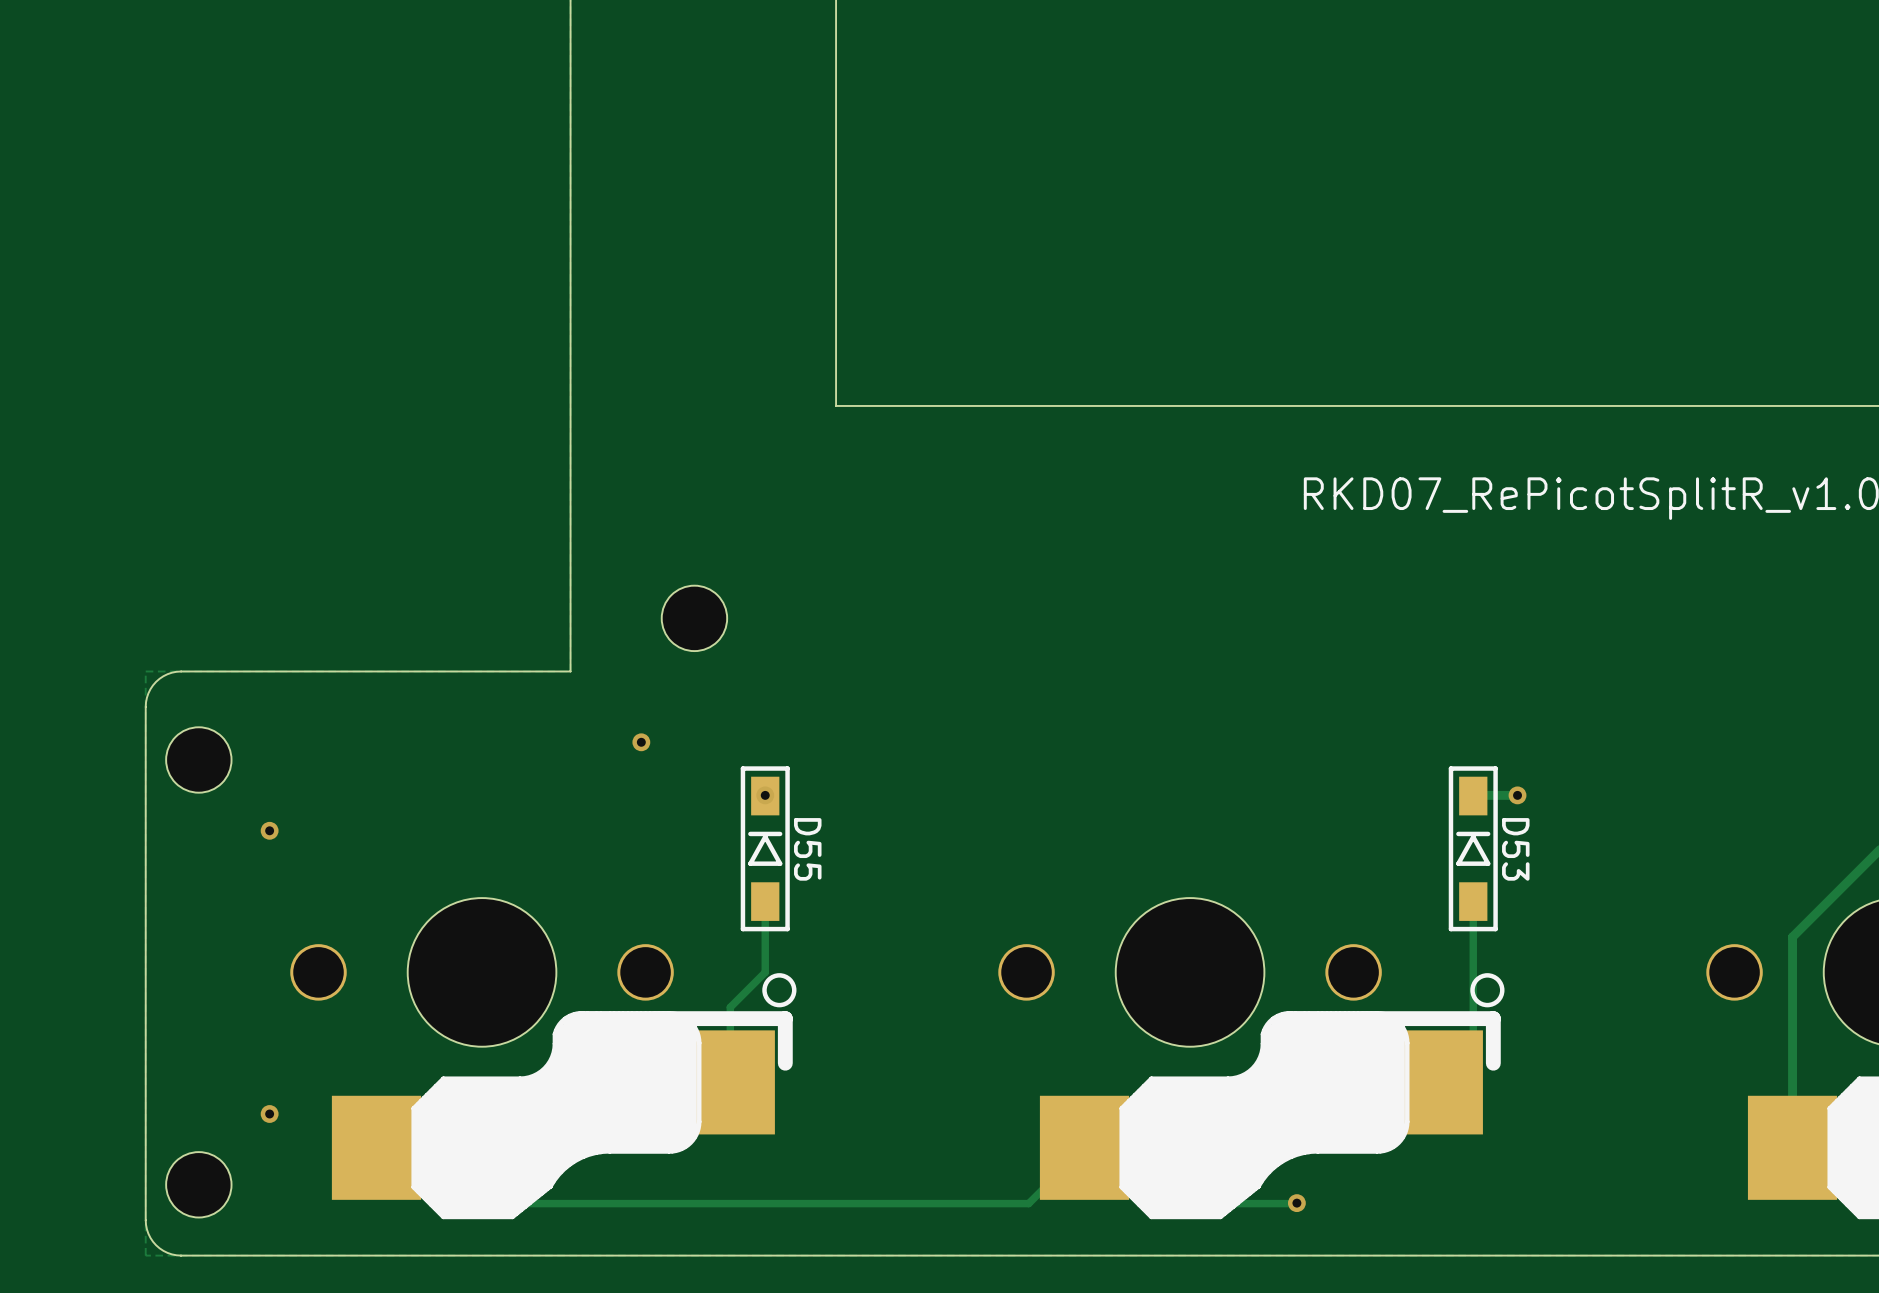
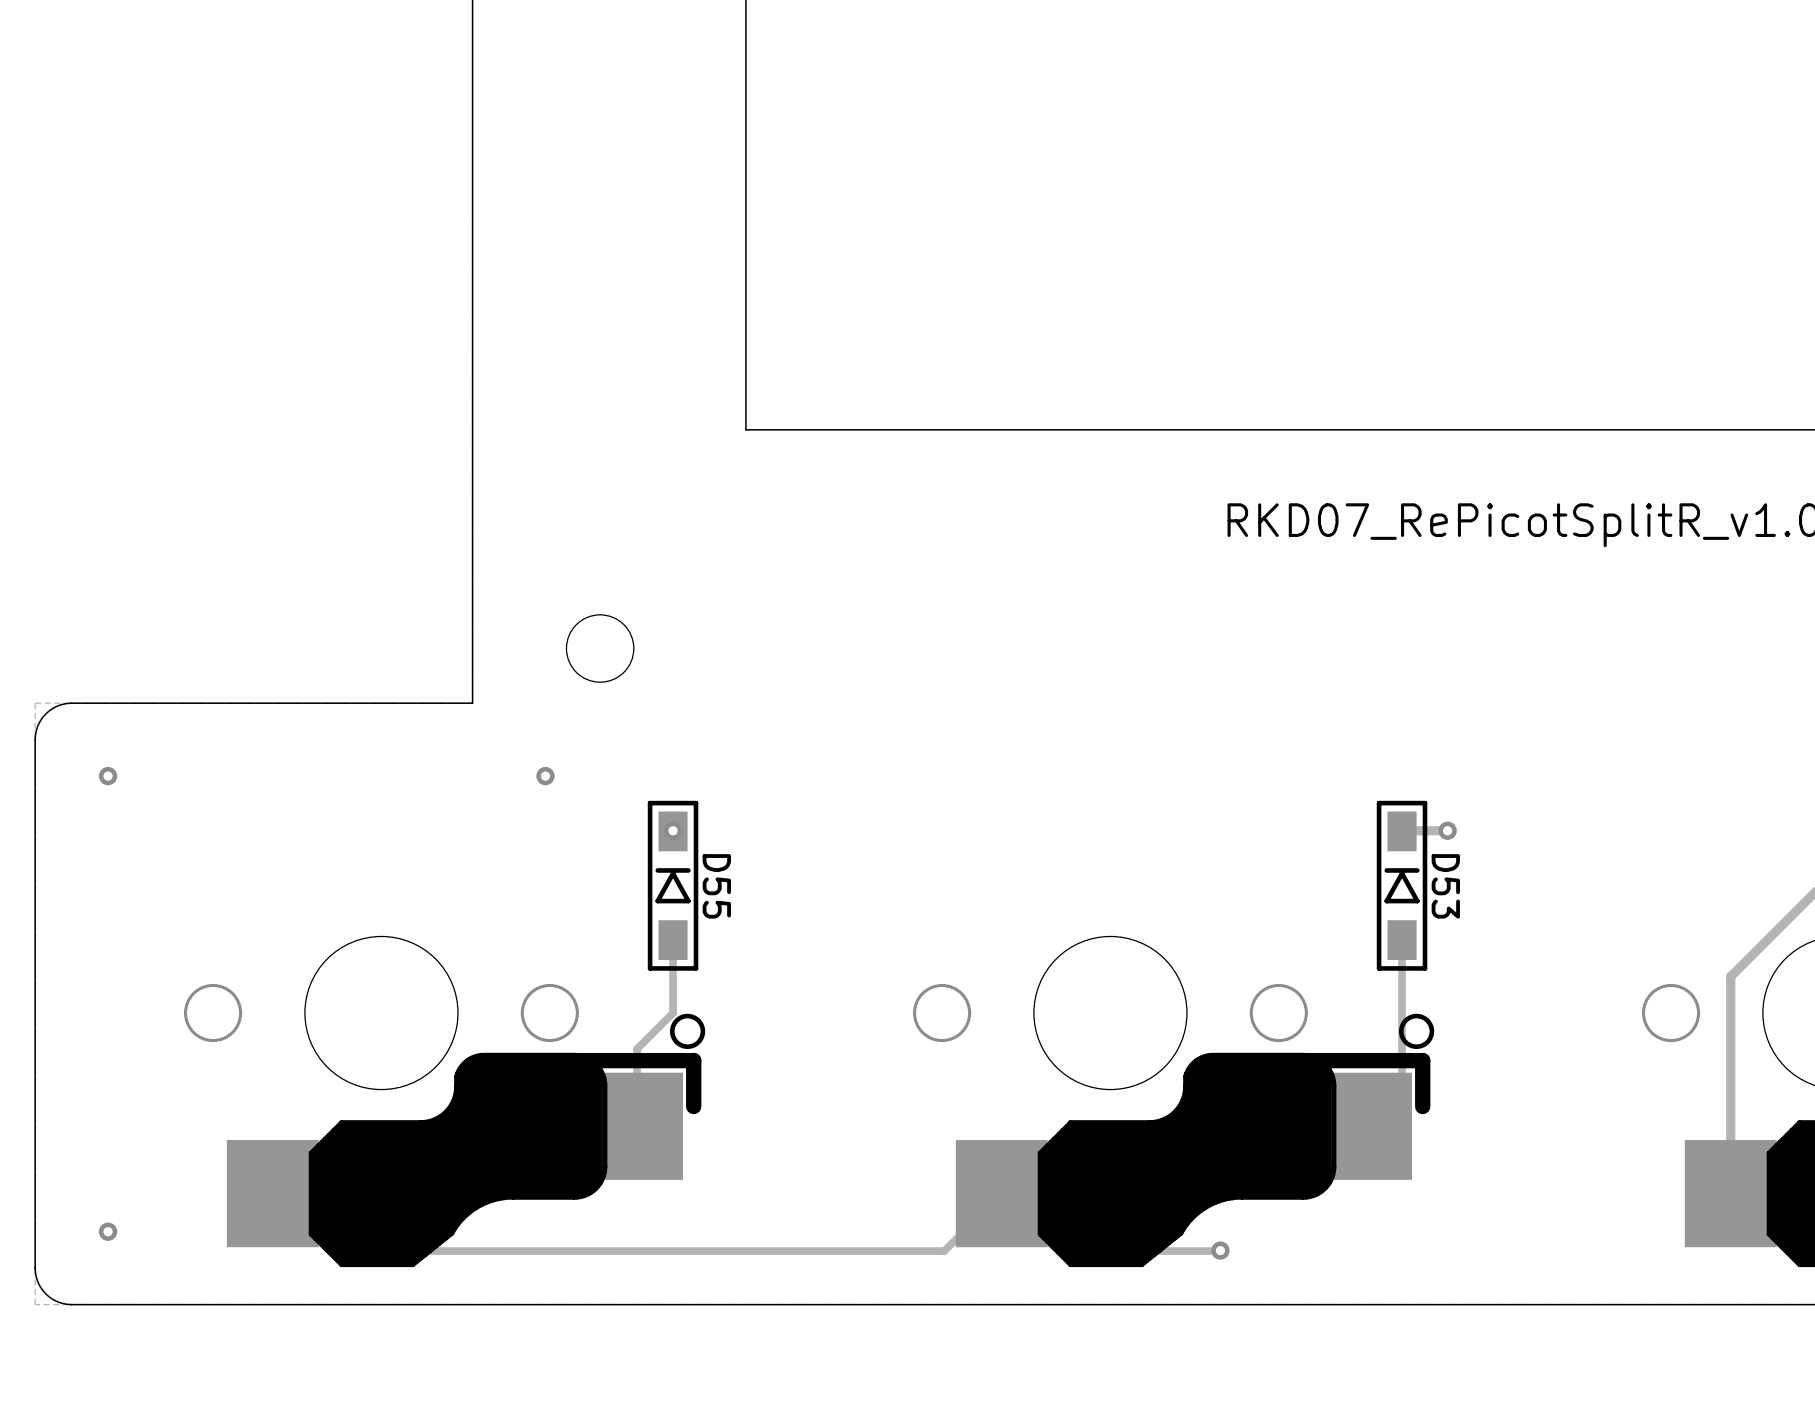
part: (198, 759) -> none
via position: (269, 830) -> (108, 776)
via position: (269, 1113) -> (108, 1231)
part: (198, 1184) -> none

